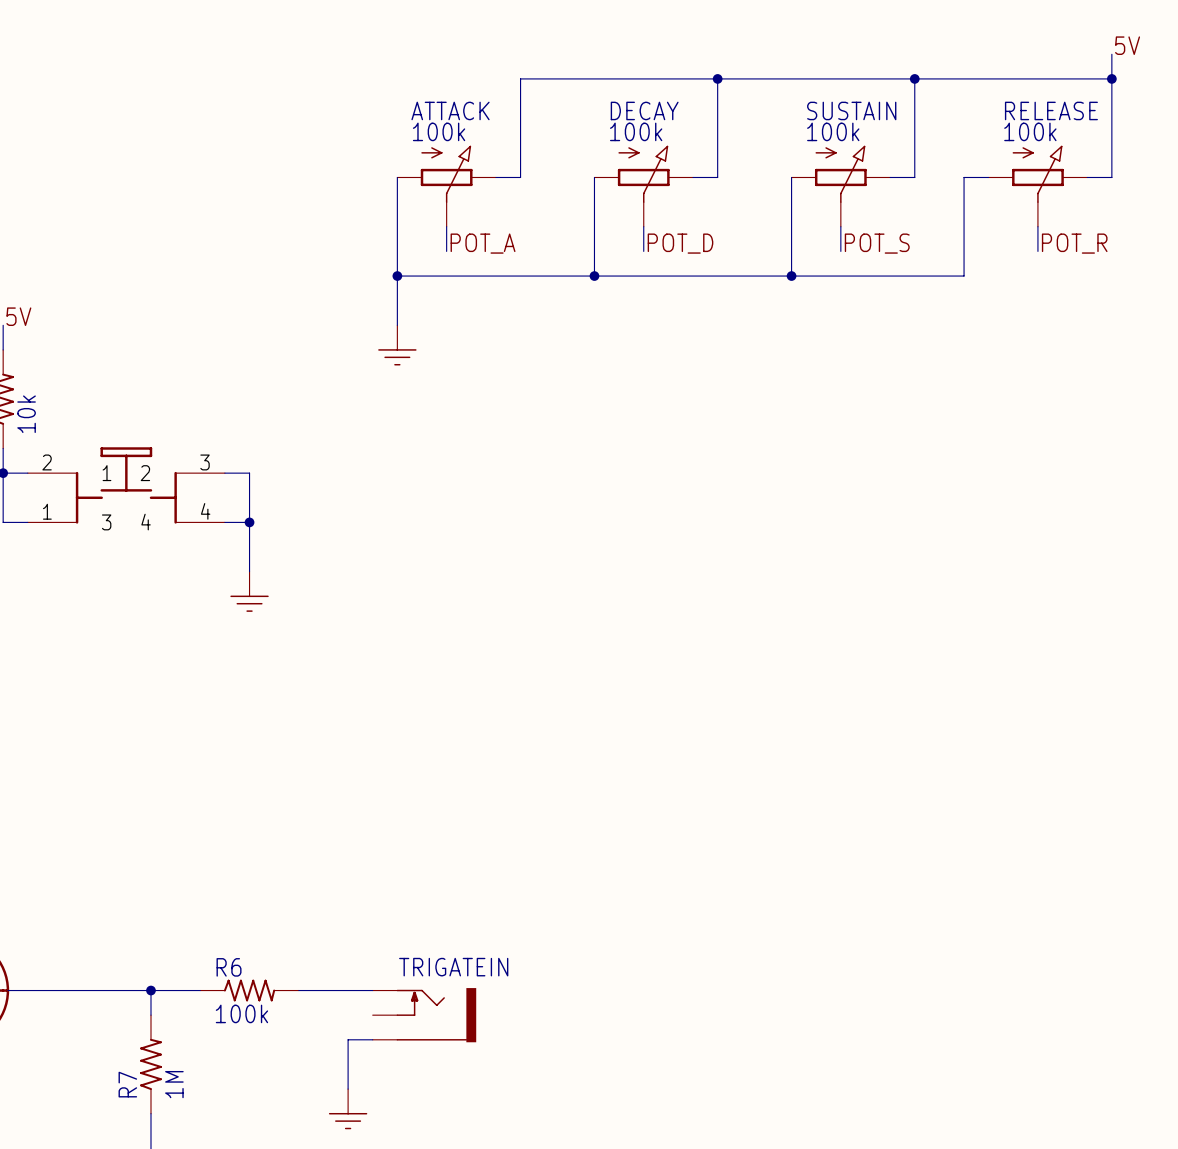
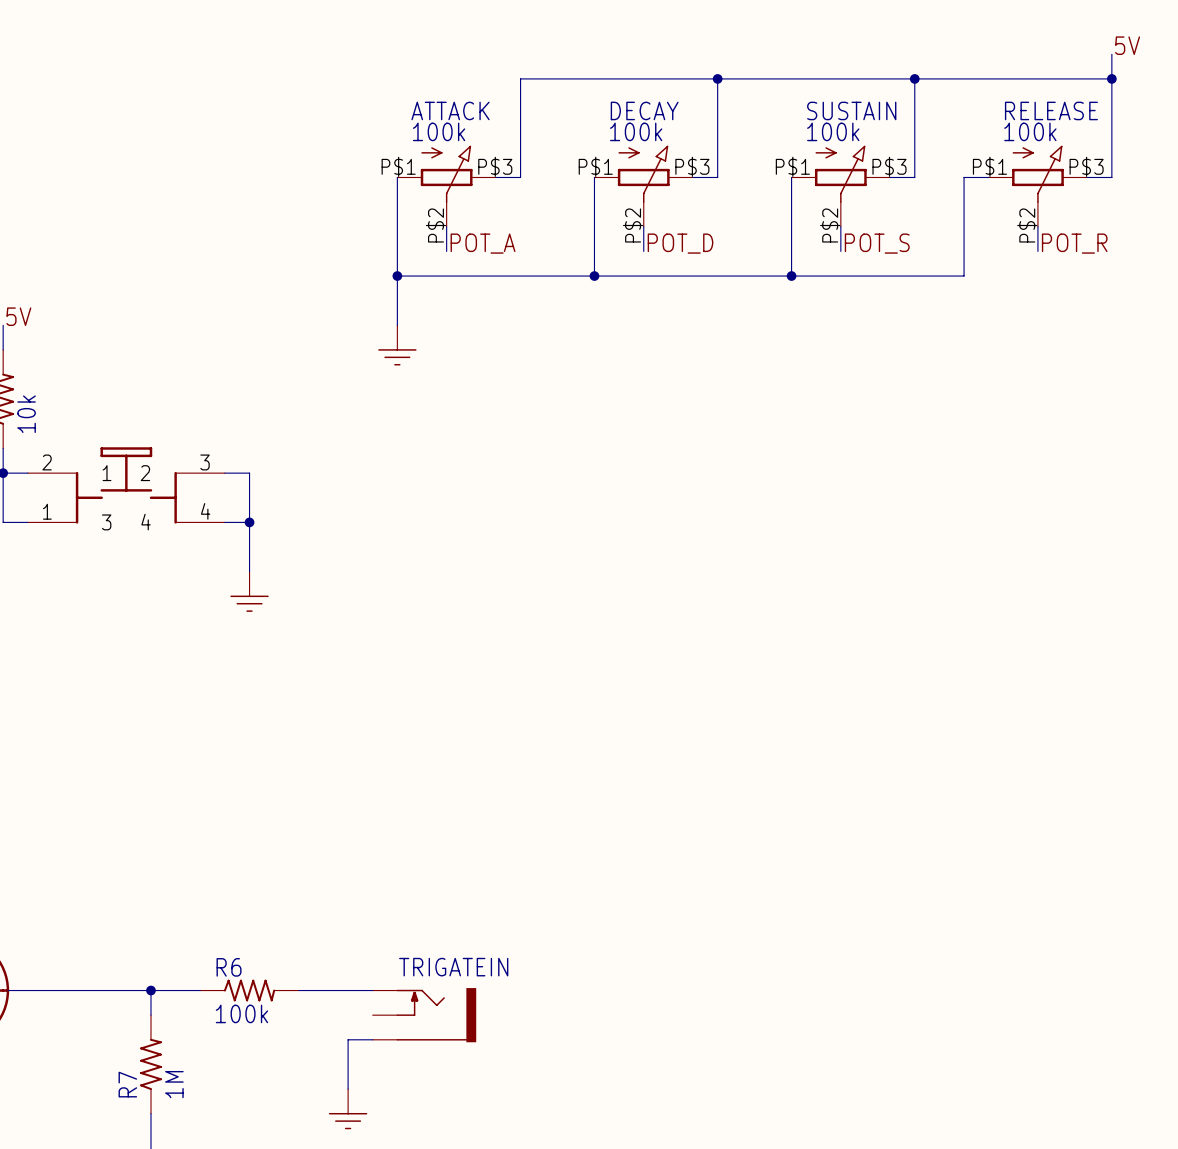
ATTACK pin number: none -> P$1 (398, 166)
ATTACK pin number: none -> P$3 (495, 166)
DECAY pin number: none -> P$1 (595, 166)
DECAY pin number: none -> P$3 (692, 166)
SUSTAIN pin number: none -> P$1 (792, 166)
SUSTAIN pin number: none -> P$3 (889, 166)
RELEASE pin number: none -> P$1 (989, 166)
RELEASE pin number: none -> P$3 (1086, 166)
ATTACK pin number: none -> P$2 (435, 225)
DECAY pin number: none -> P$2 (633, 225)
SUSTAIN pin number: none -> P$2 (830, 225)
RELEASE pin number: none -> P$2 (1027, 225)

